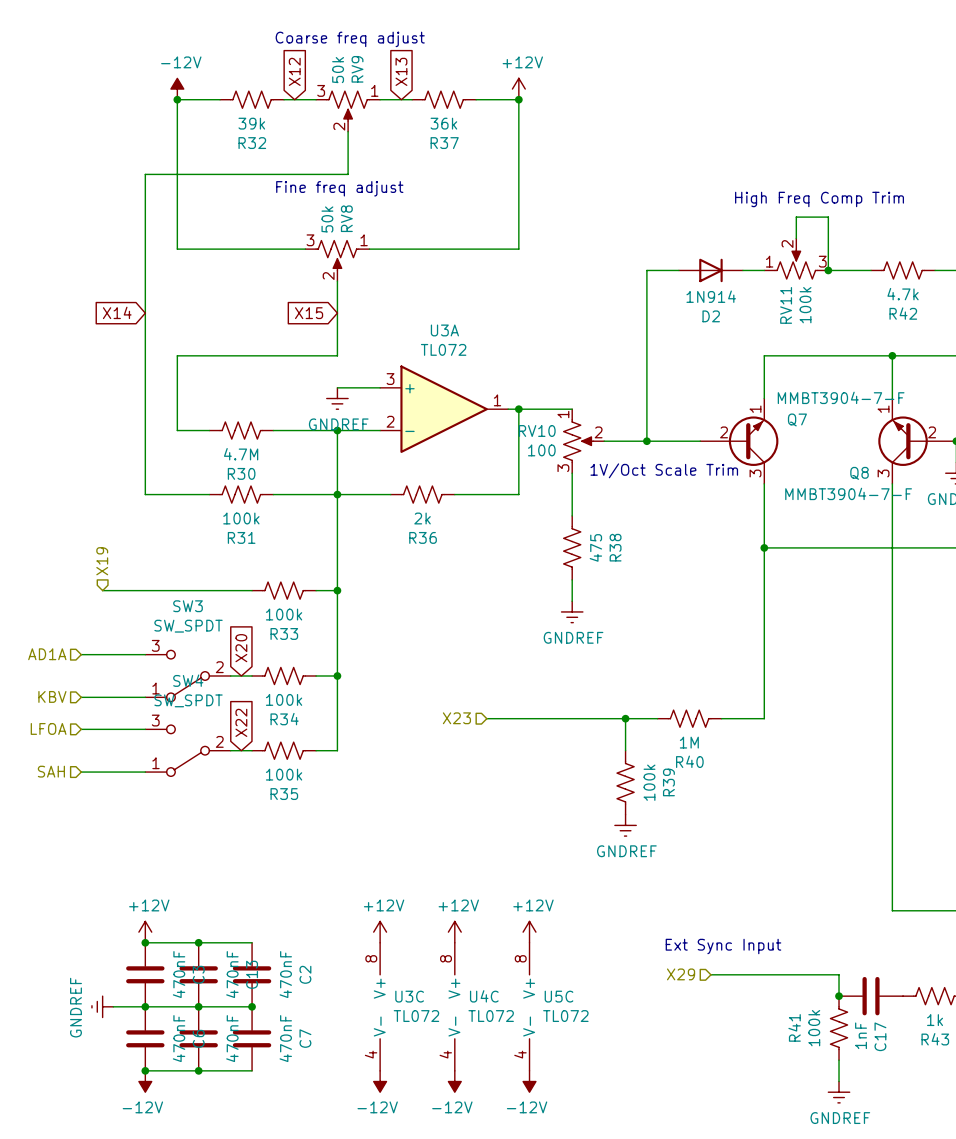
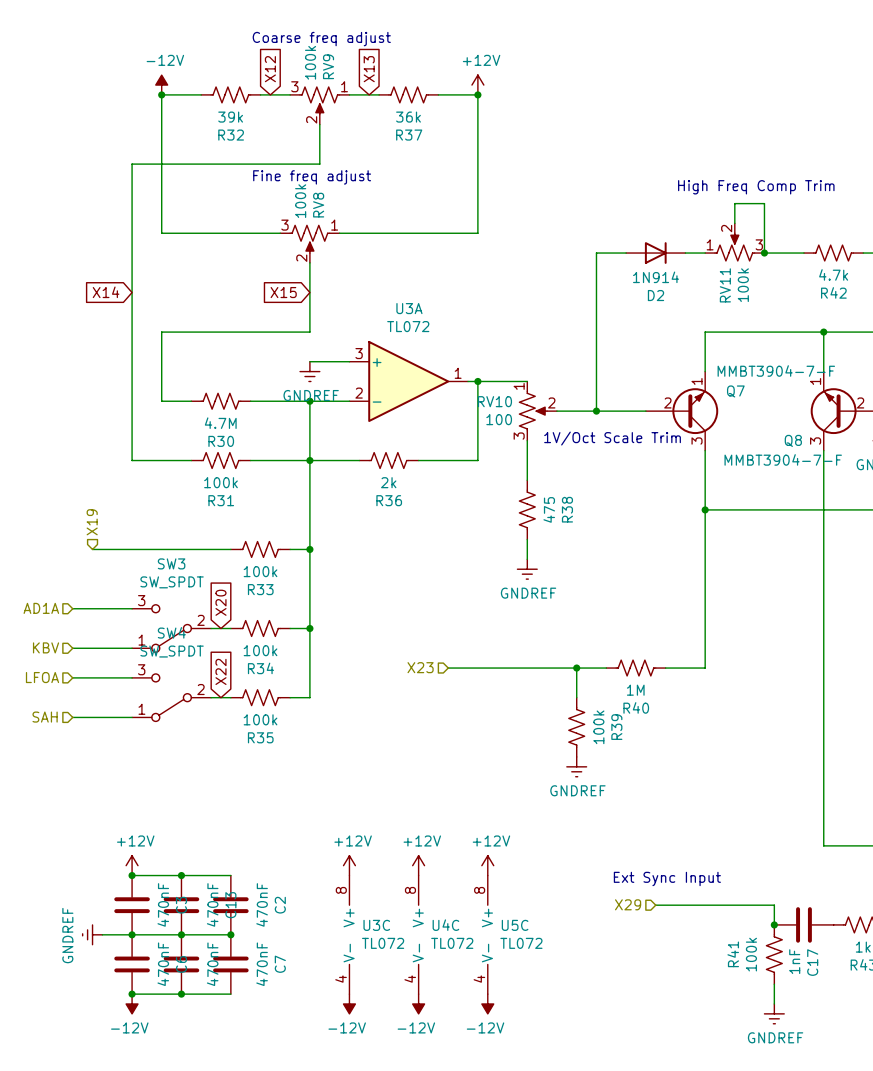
RV9 value: 50k (338, 70) -> 100k (310, 62)
RV8 value: 50k (327, 219) -> 100k (300, 201)

